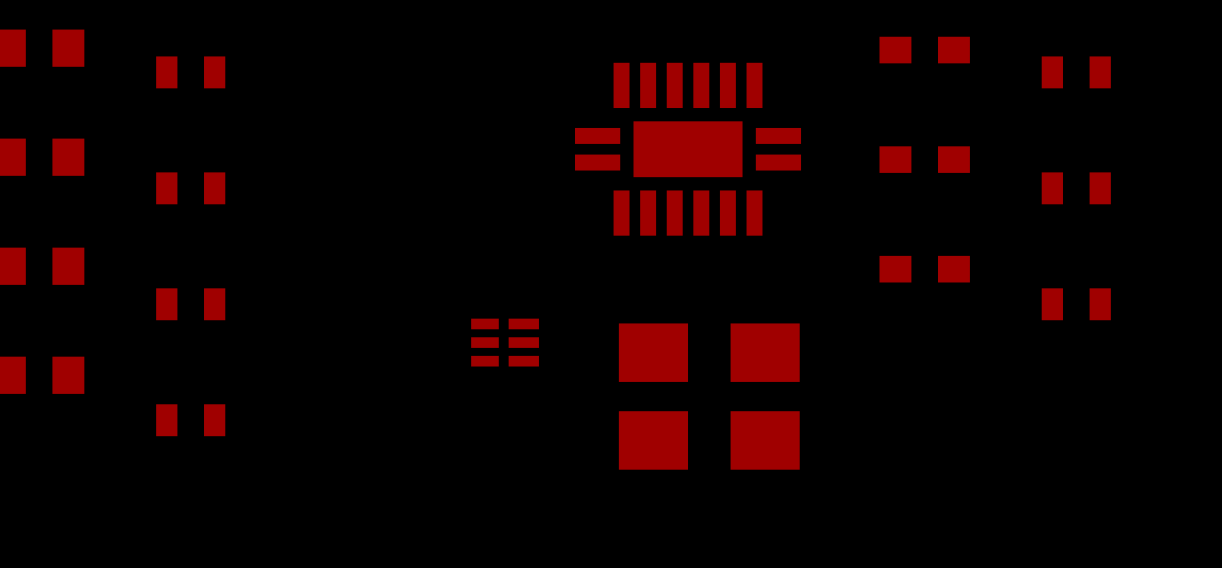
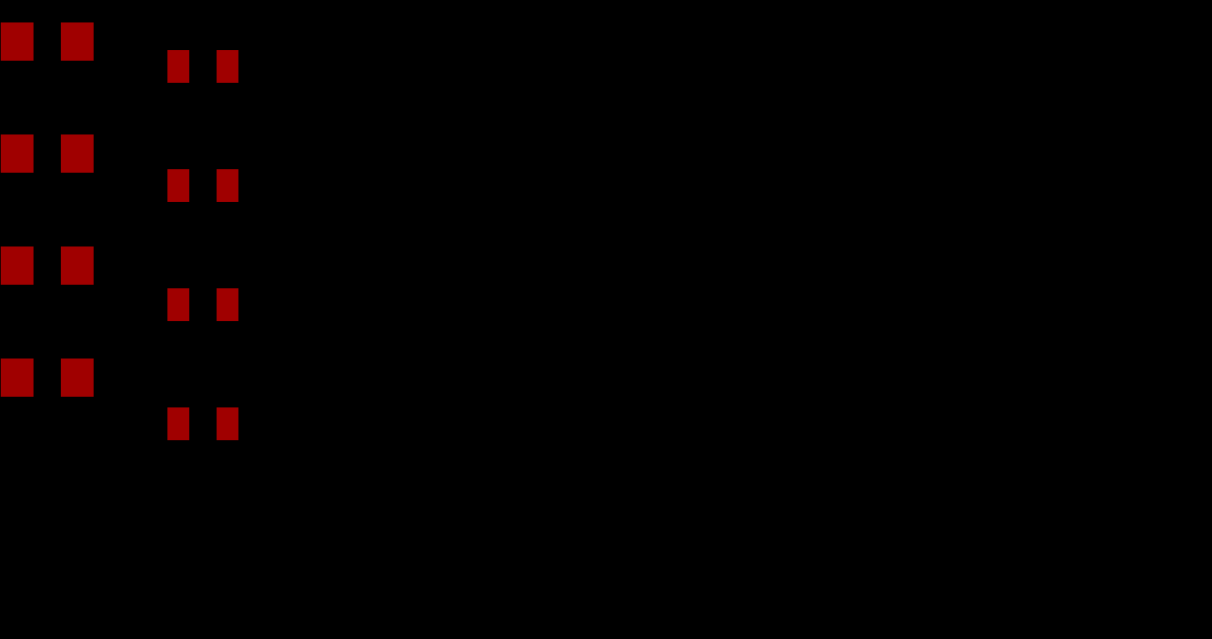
part: (924, 50) -> none
part: (1076, 72) -> none
part: (688, 149) -> none
part: (924, 159) -> none
part: (1076, 188) -> none
part: (924, 269) -> none
part: (1076, 304) -> none
part: (505, 342) -> none
part: (709, 396) -> none

